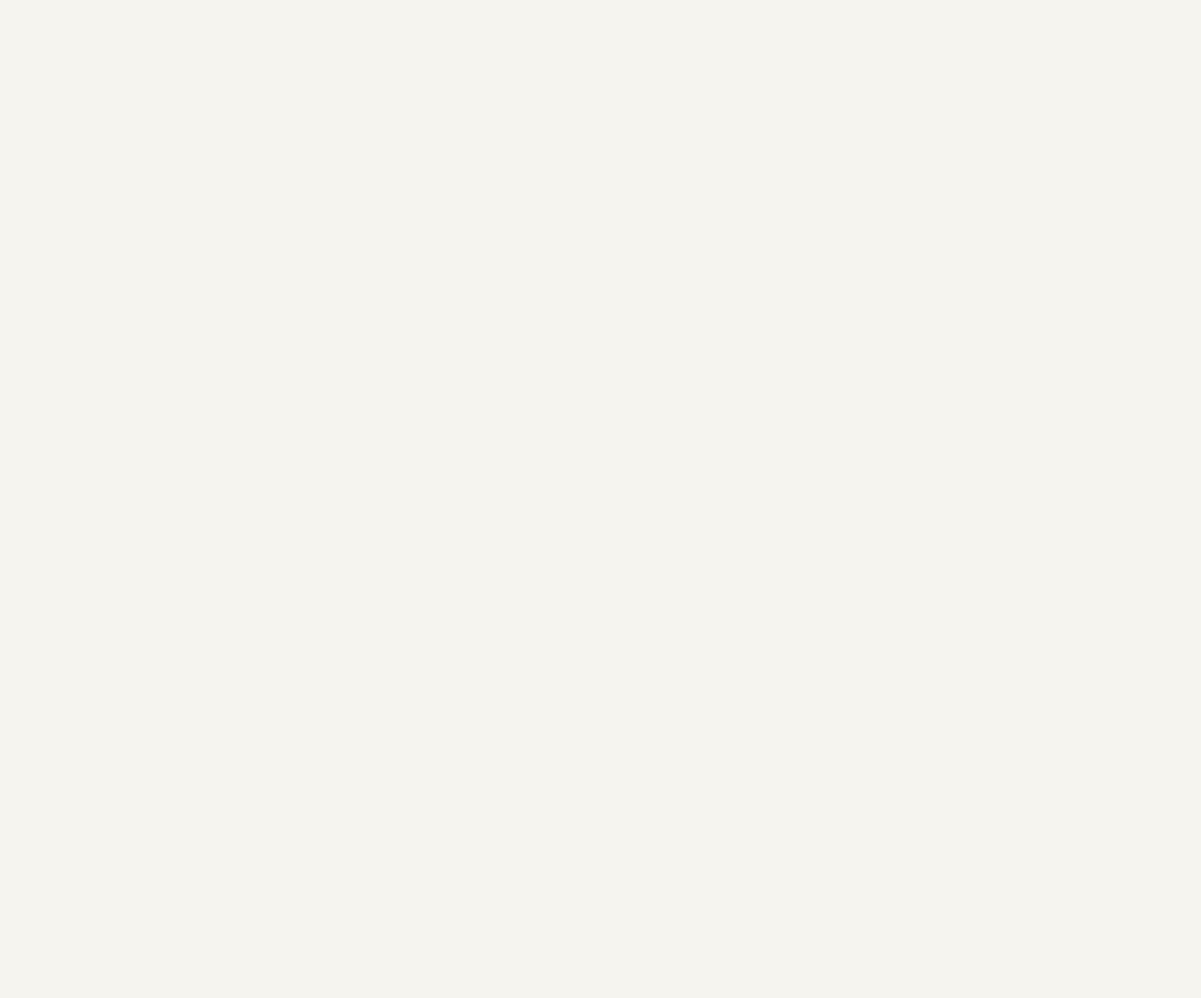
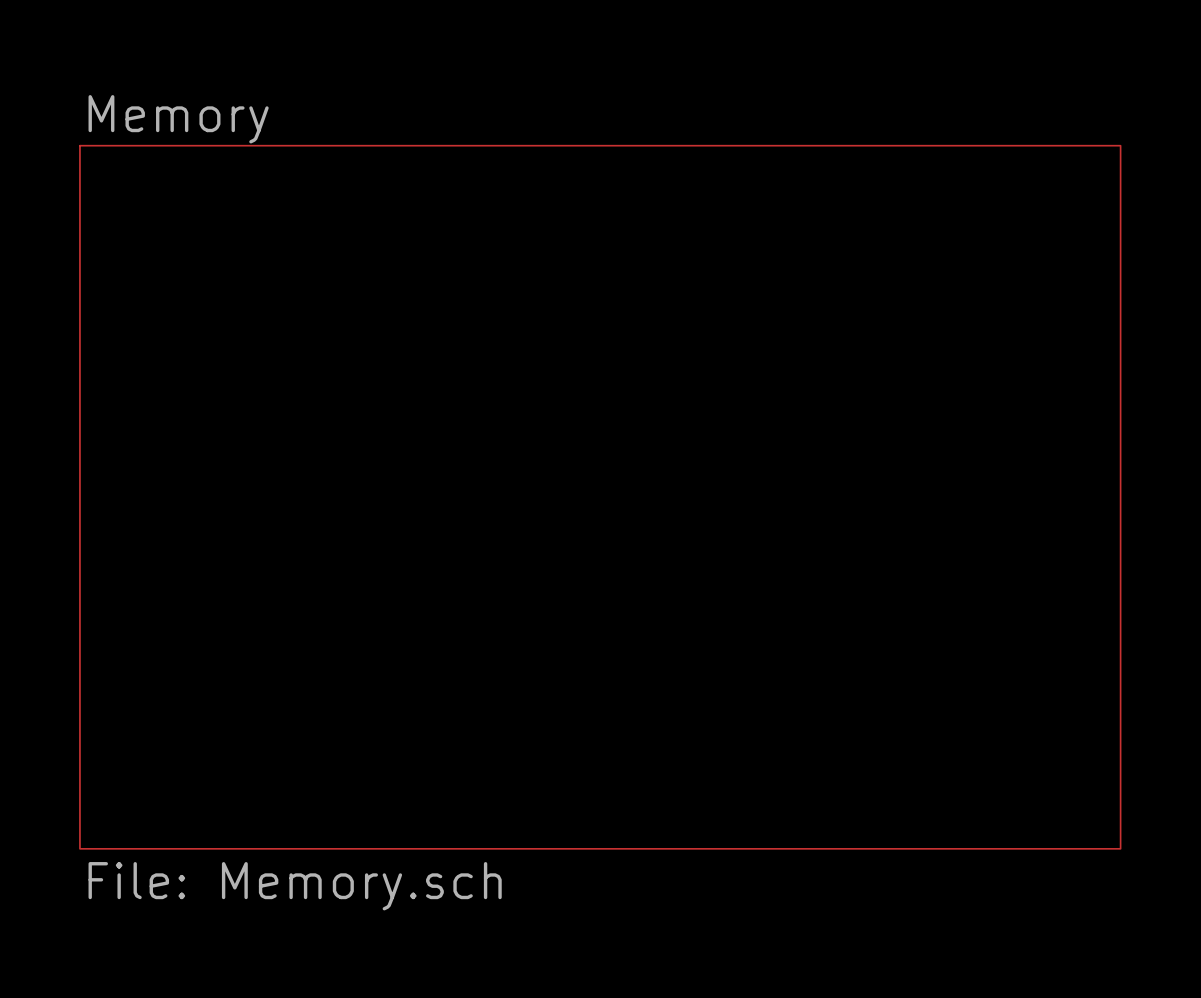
sheet Memory: none -> File: Memory.sch (600, 497)

